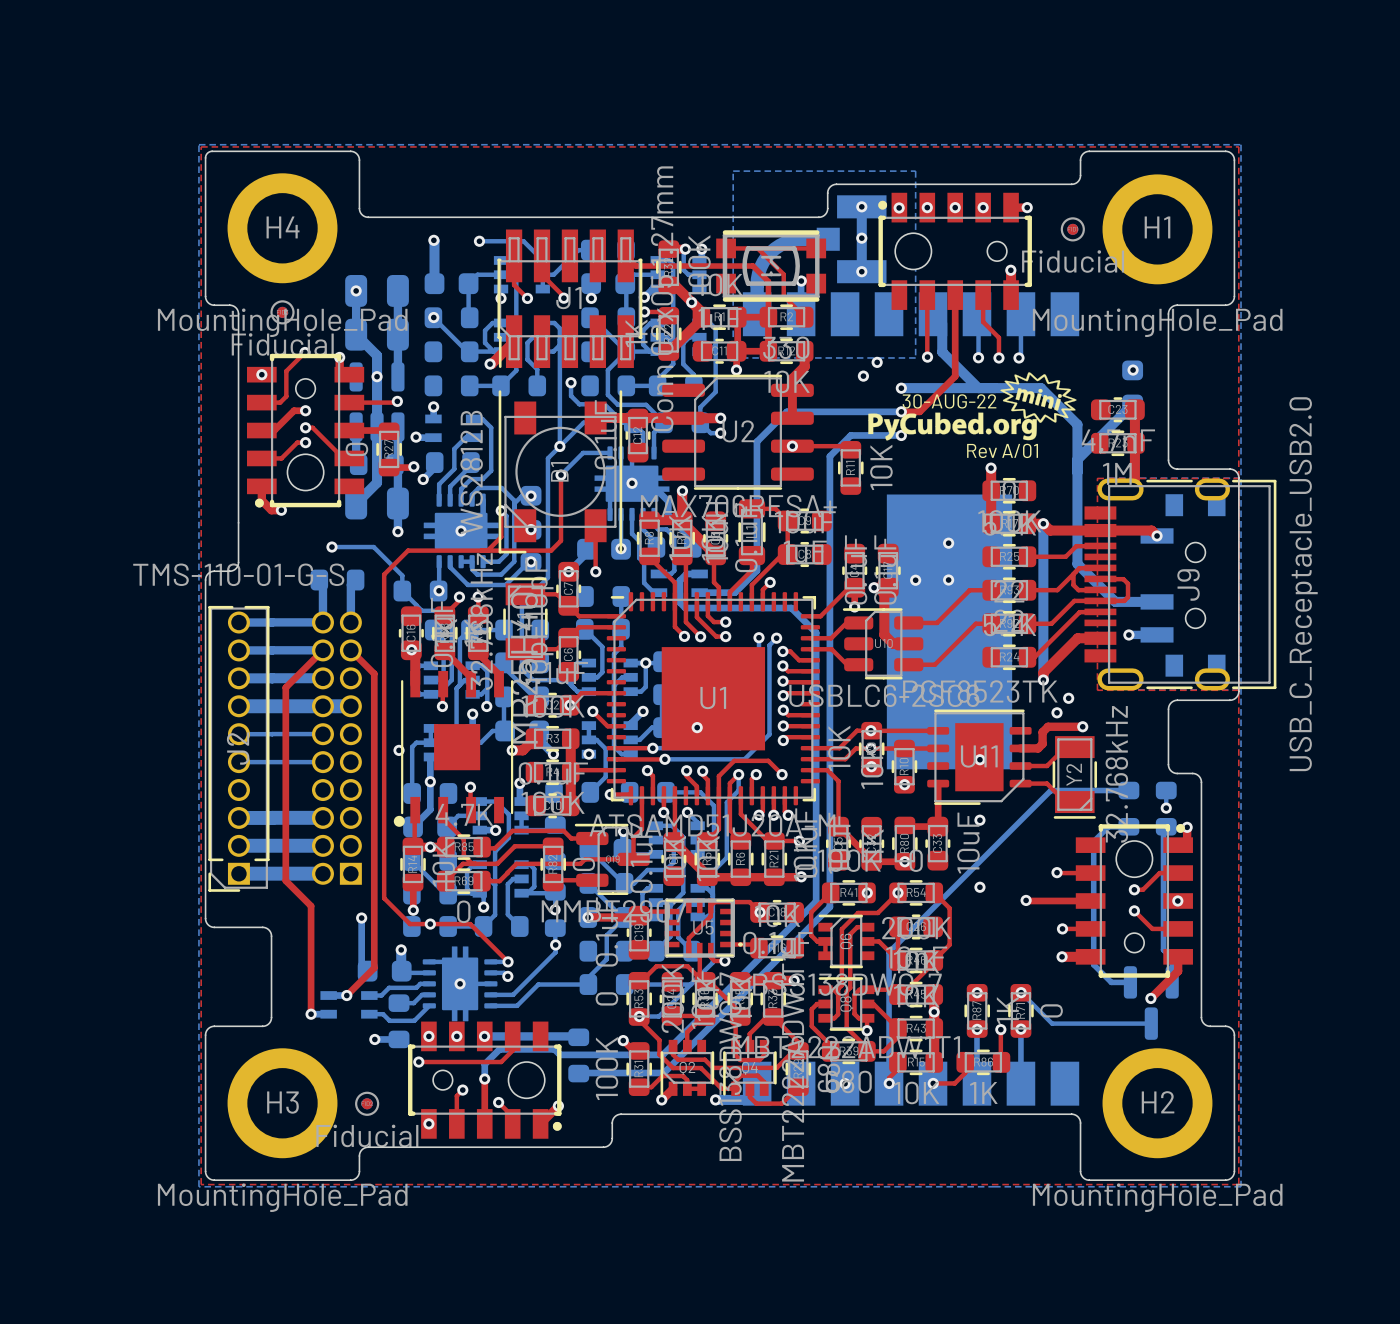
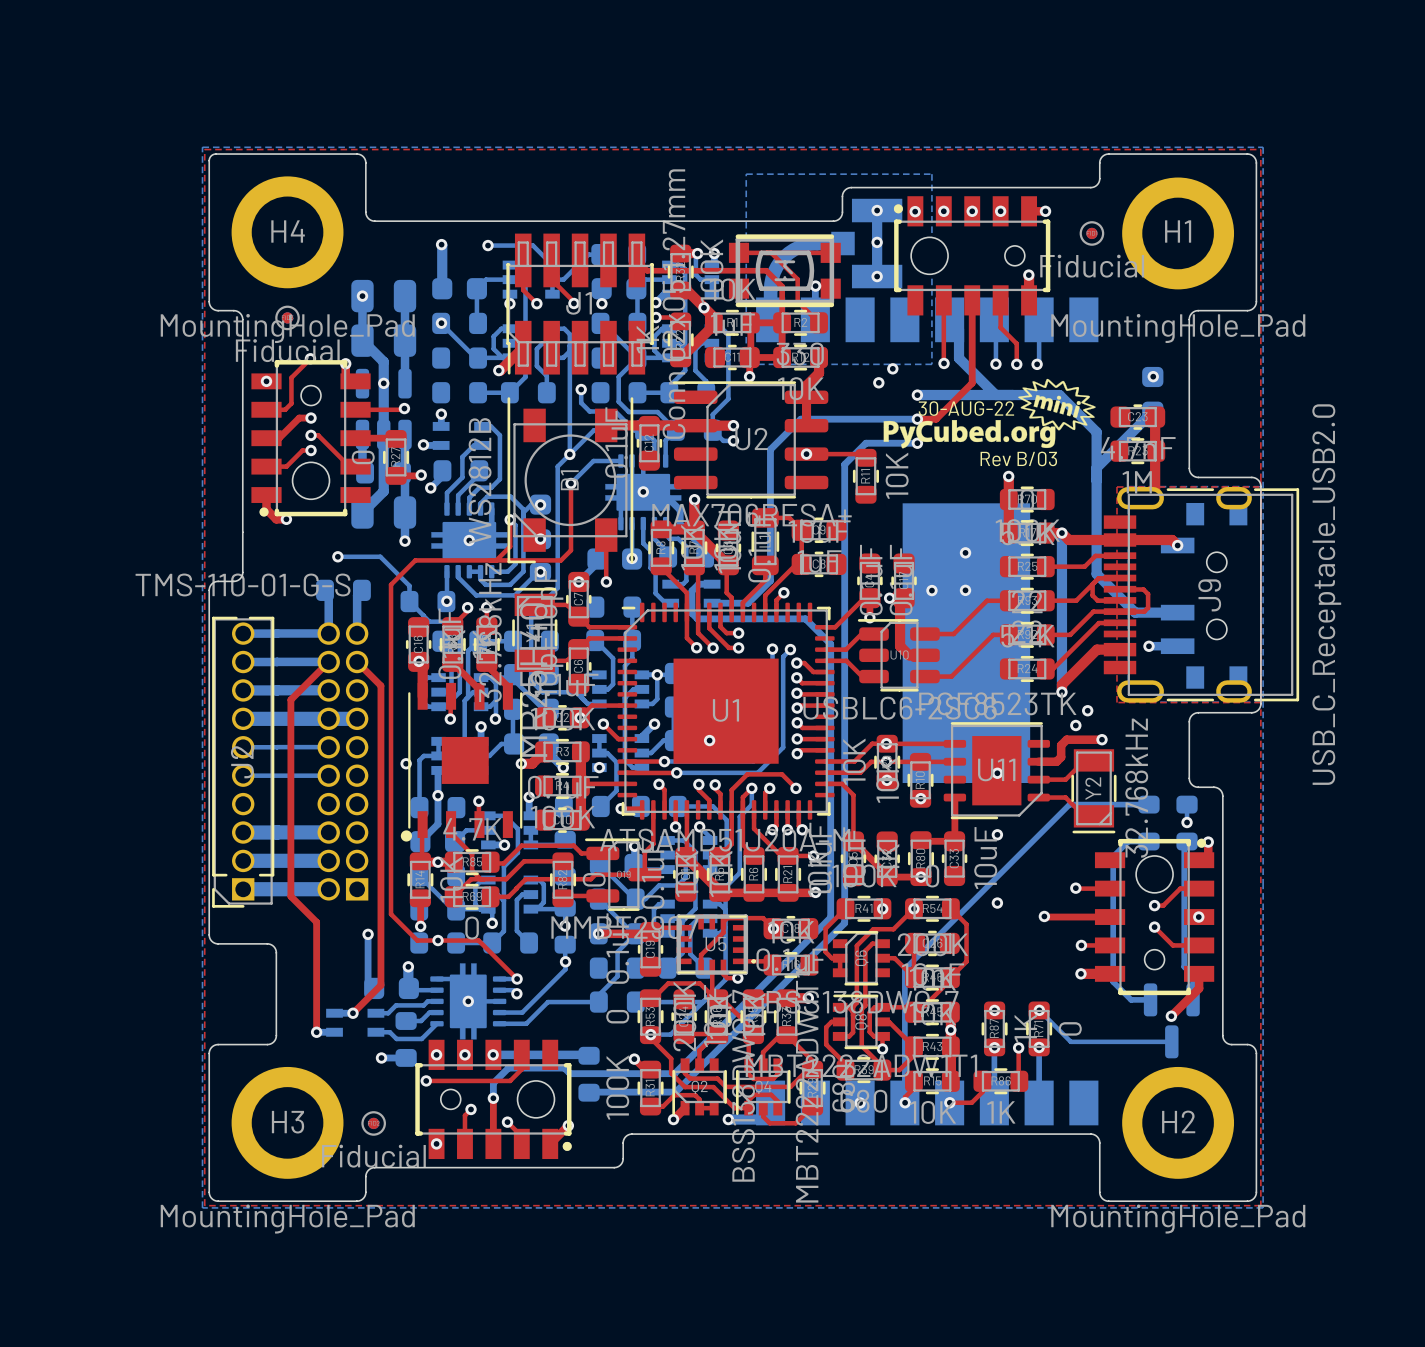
text: Rev A/01 (1002, 450) -> Rev B/03 (1018, 458)

